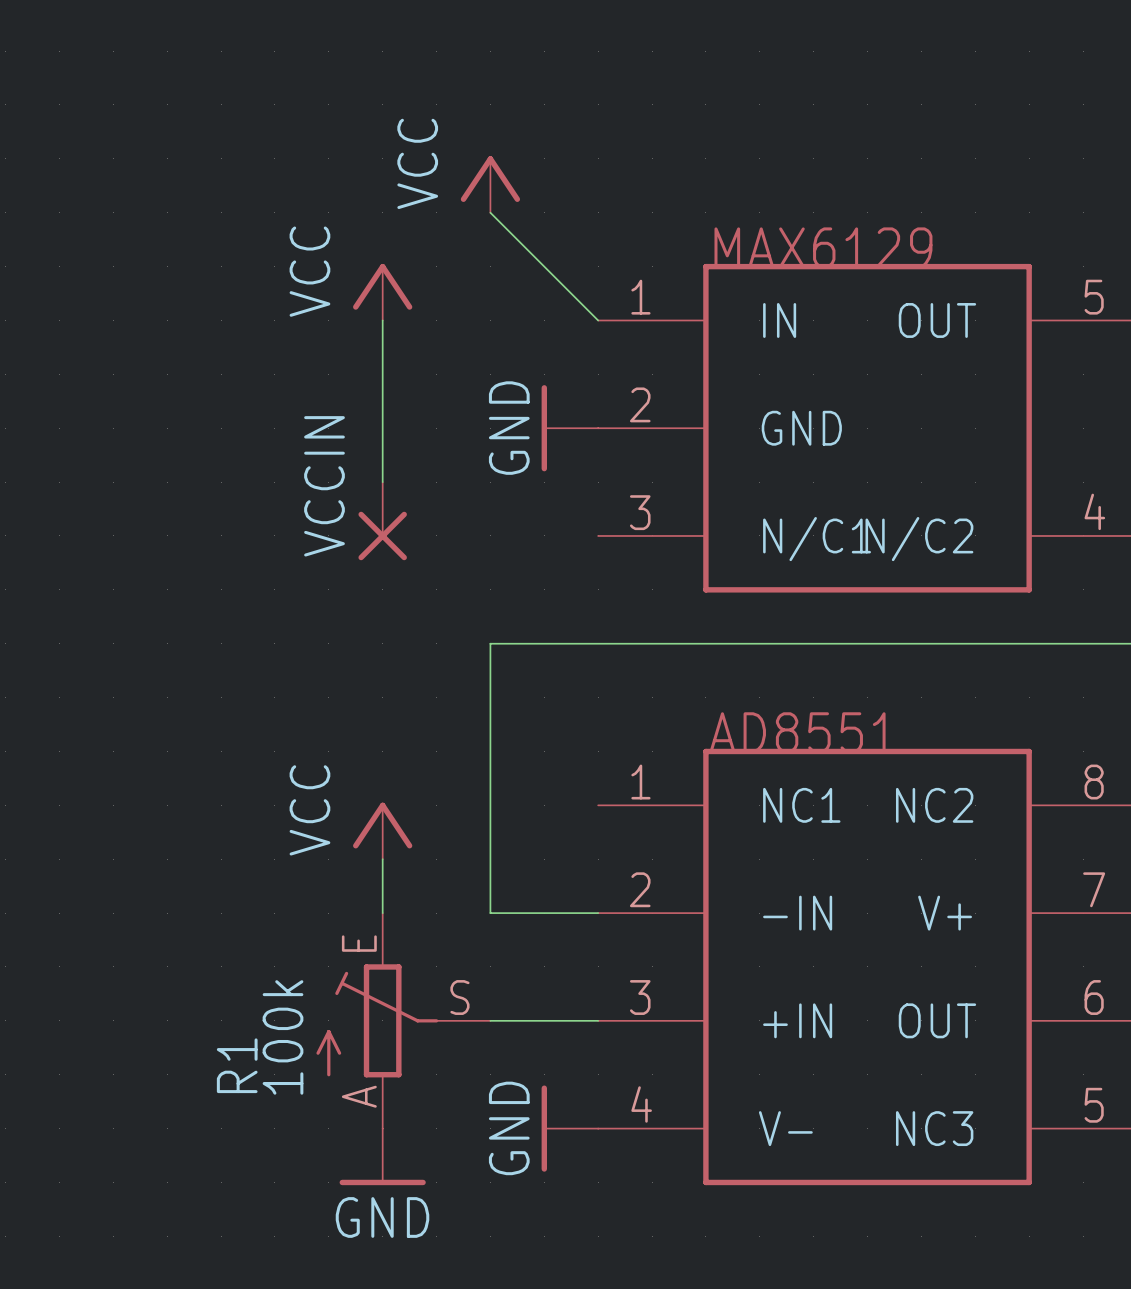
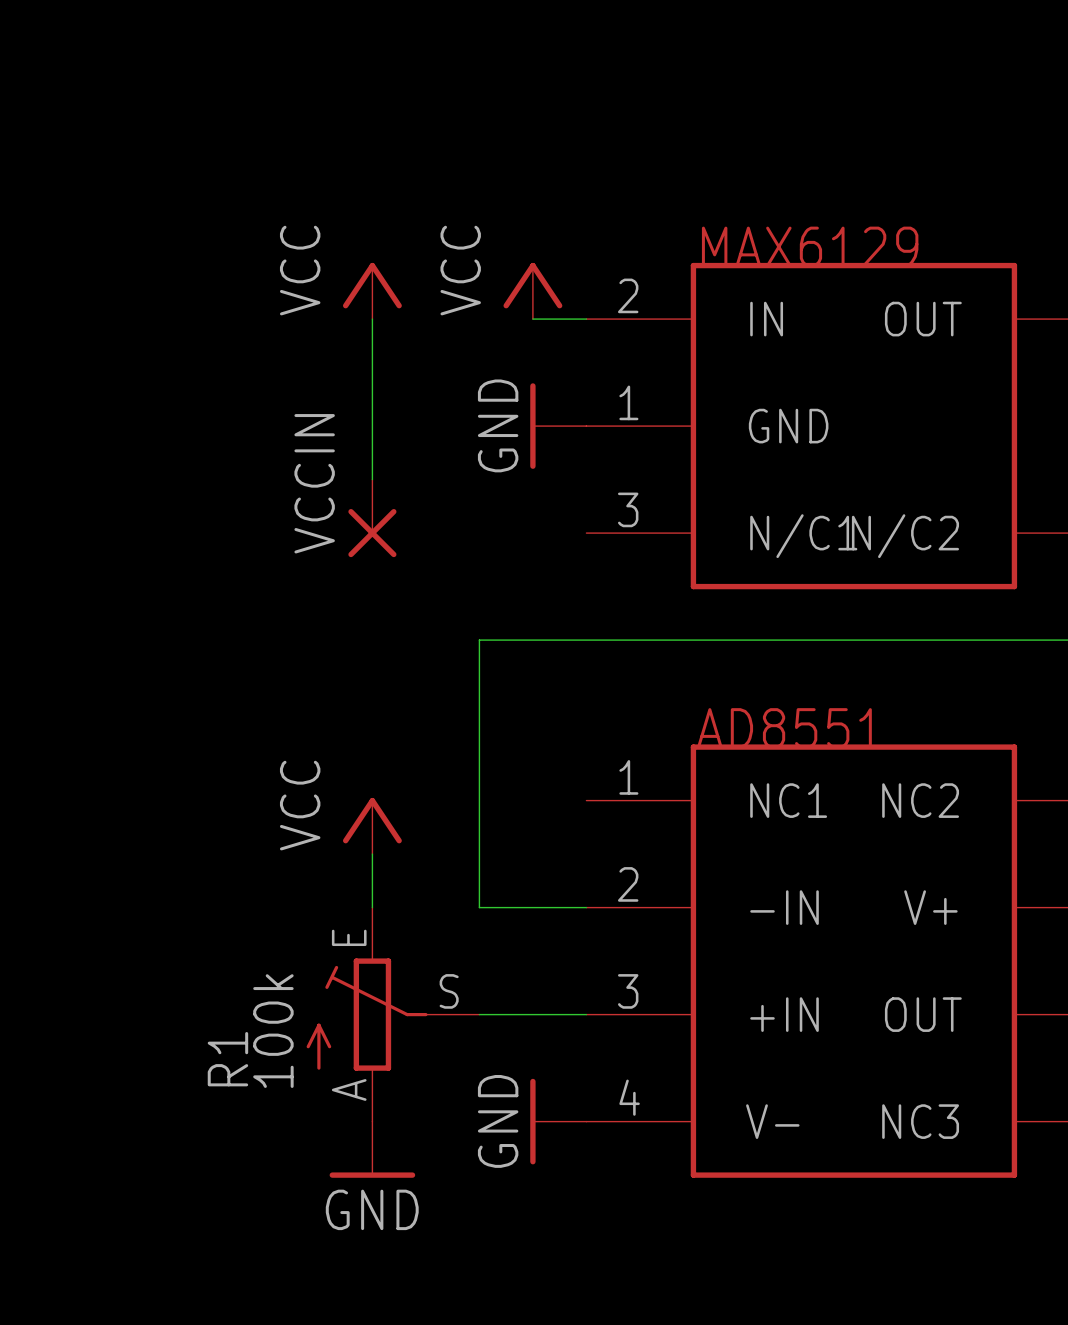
power symbol position: VCC (490, 184) -> VCC (532, 290)
wire: (490, 212) (598, 320) -> (532, 319) (586, 319)
part pin number: 1 (640, 297) -> 2 (628, 295)
part pin number: 2 (640, 404) -> 1 (628, 402)

